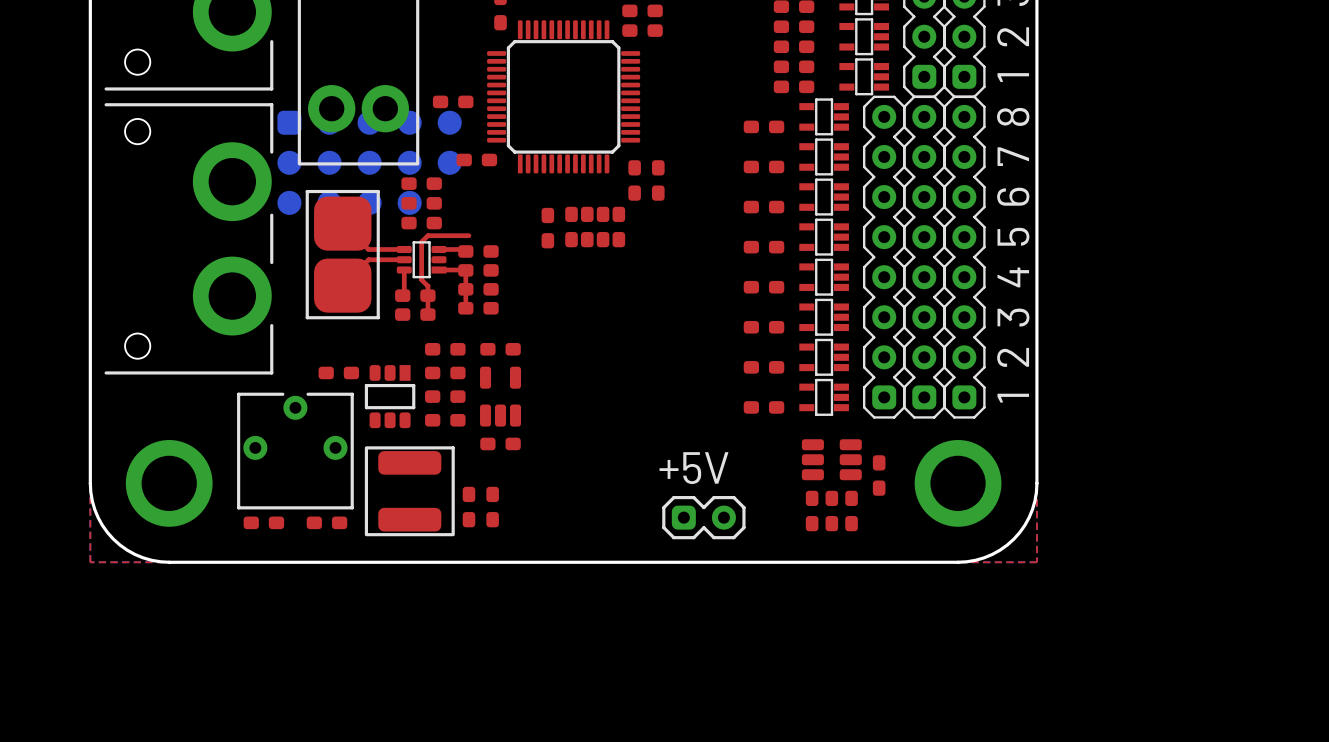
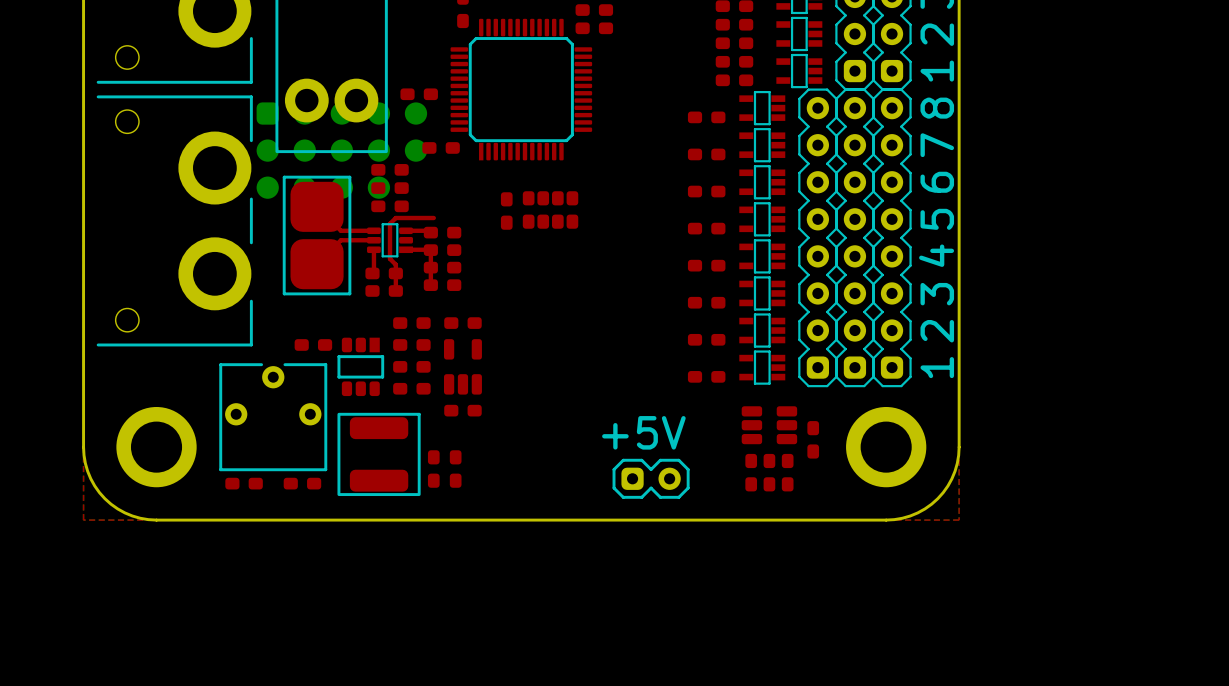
part: (634, 180) -> none
part: (658, 180) -> none

